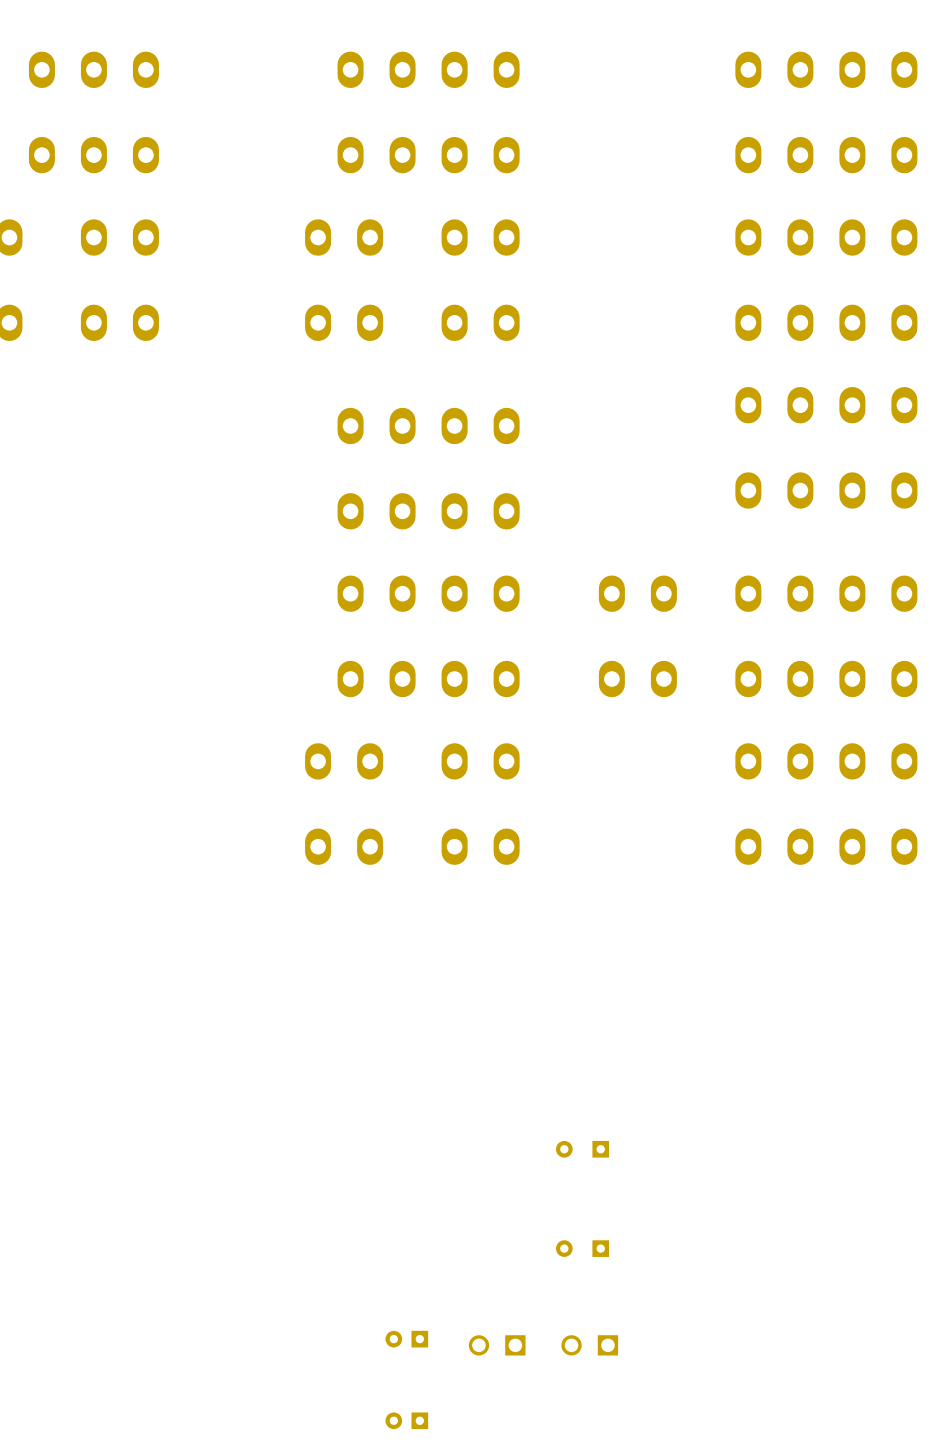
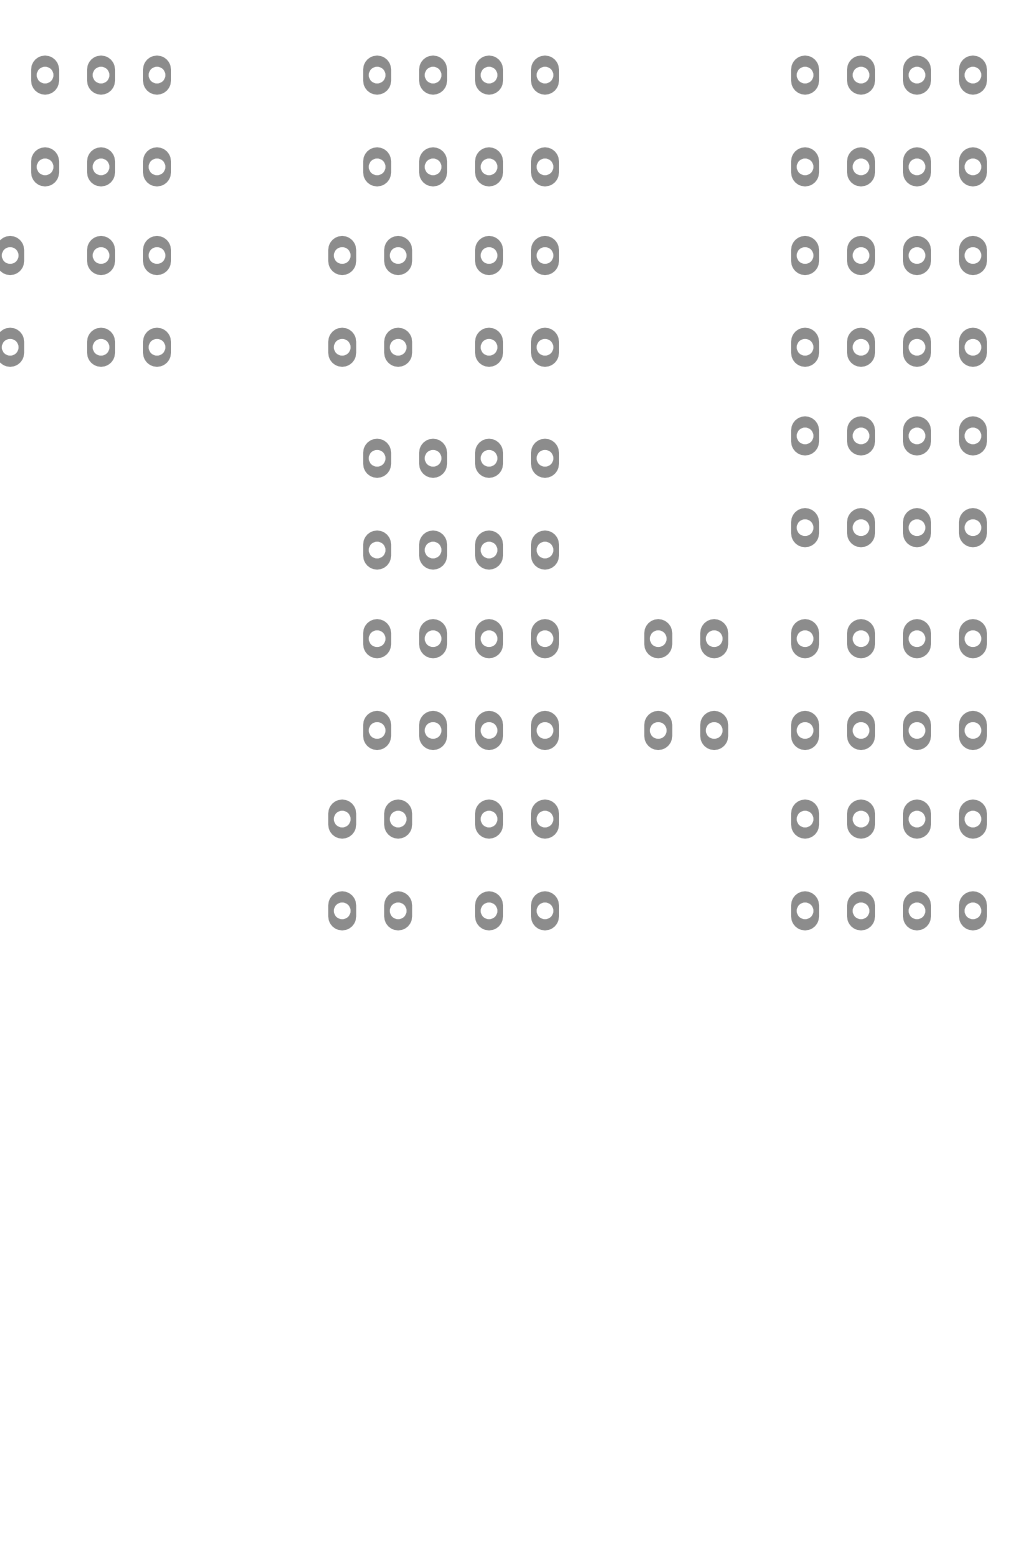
part: (582, 1149) -> none
part: (582, 1248) -> none
part: (406, 1339) -> none
part: (497, 1345) -> none
part: (589, 1345) -> none
part: (406, 1420) -> none

